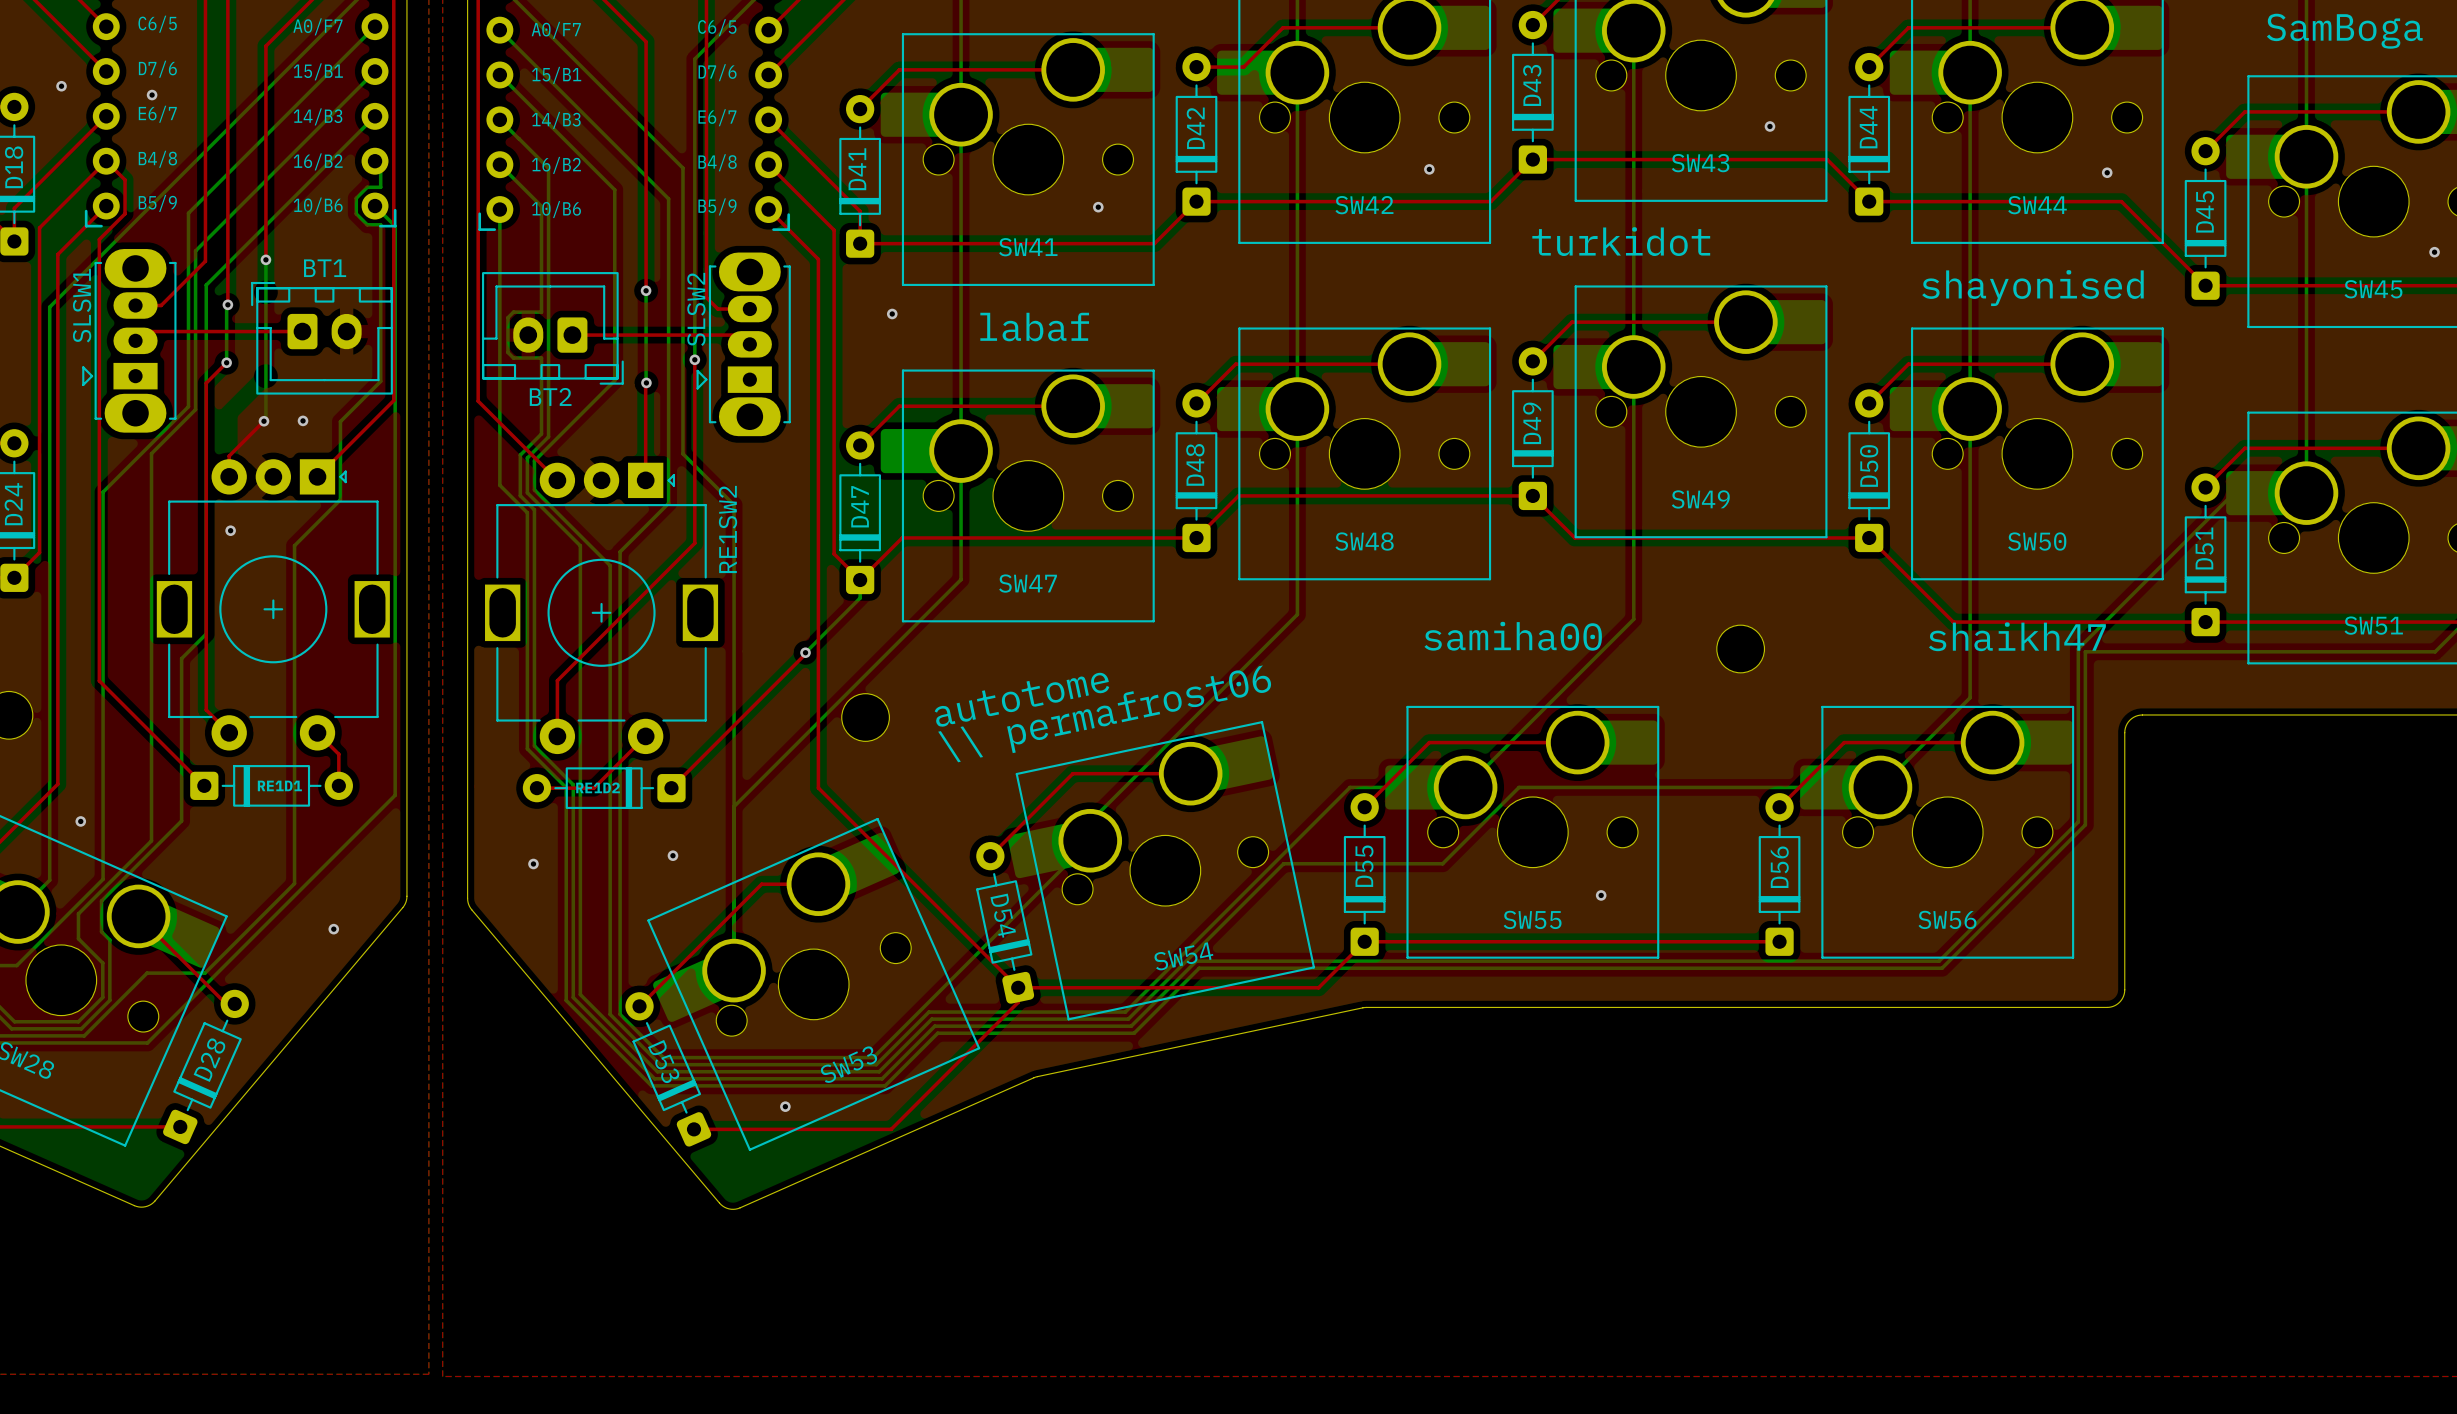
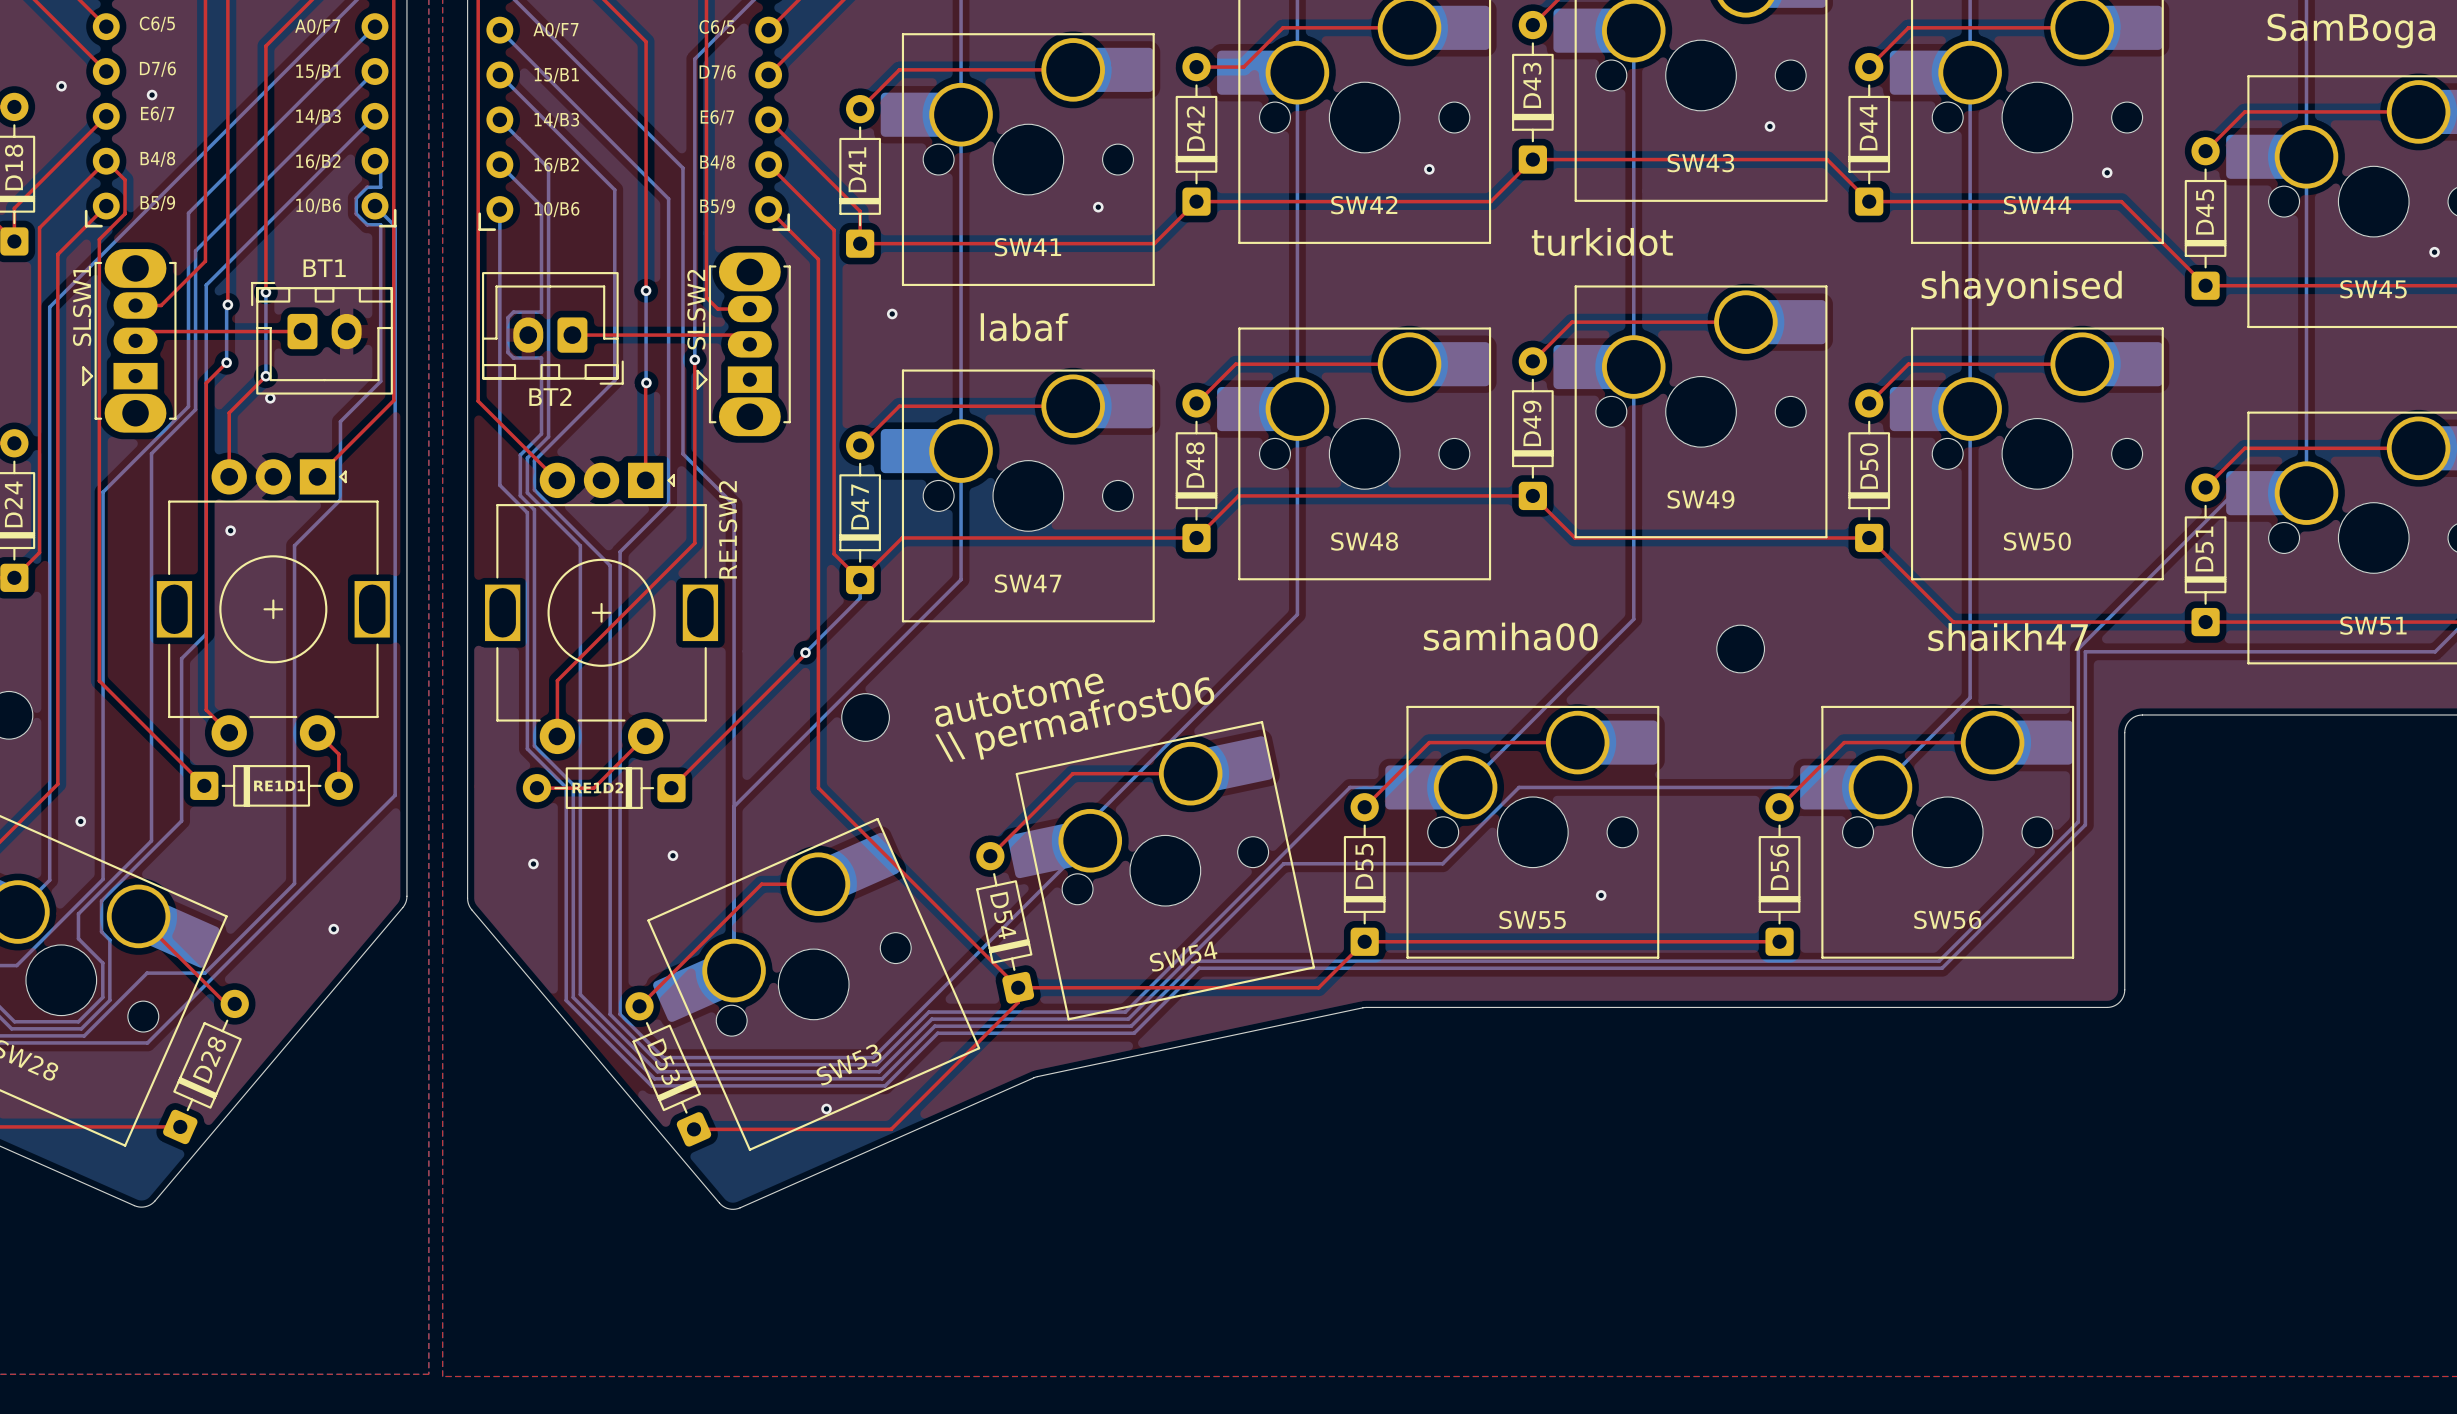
top track: none -> (265, 259) (265, 292)
bottom track: (265, 259) (265, 292) -> none
via position: (265, 259) -> (265, 292)
bottom track: (265, 376) (265, 419) (263, 421) -> none
via: none -> (265, 376)
via: none -> (270, 398)
via: (303, 420) -> none
top track: (263, 421) (229, 456) -> (265, 376) (229, 412) (229, 456)
via: (263, 421) -> none
via position: (785, 1106) -> (826, 1108)

